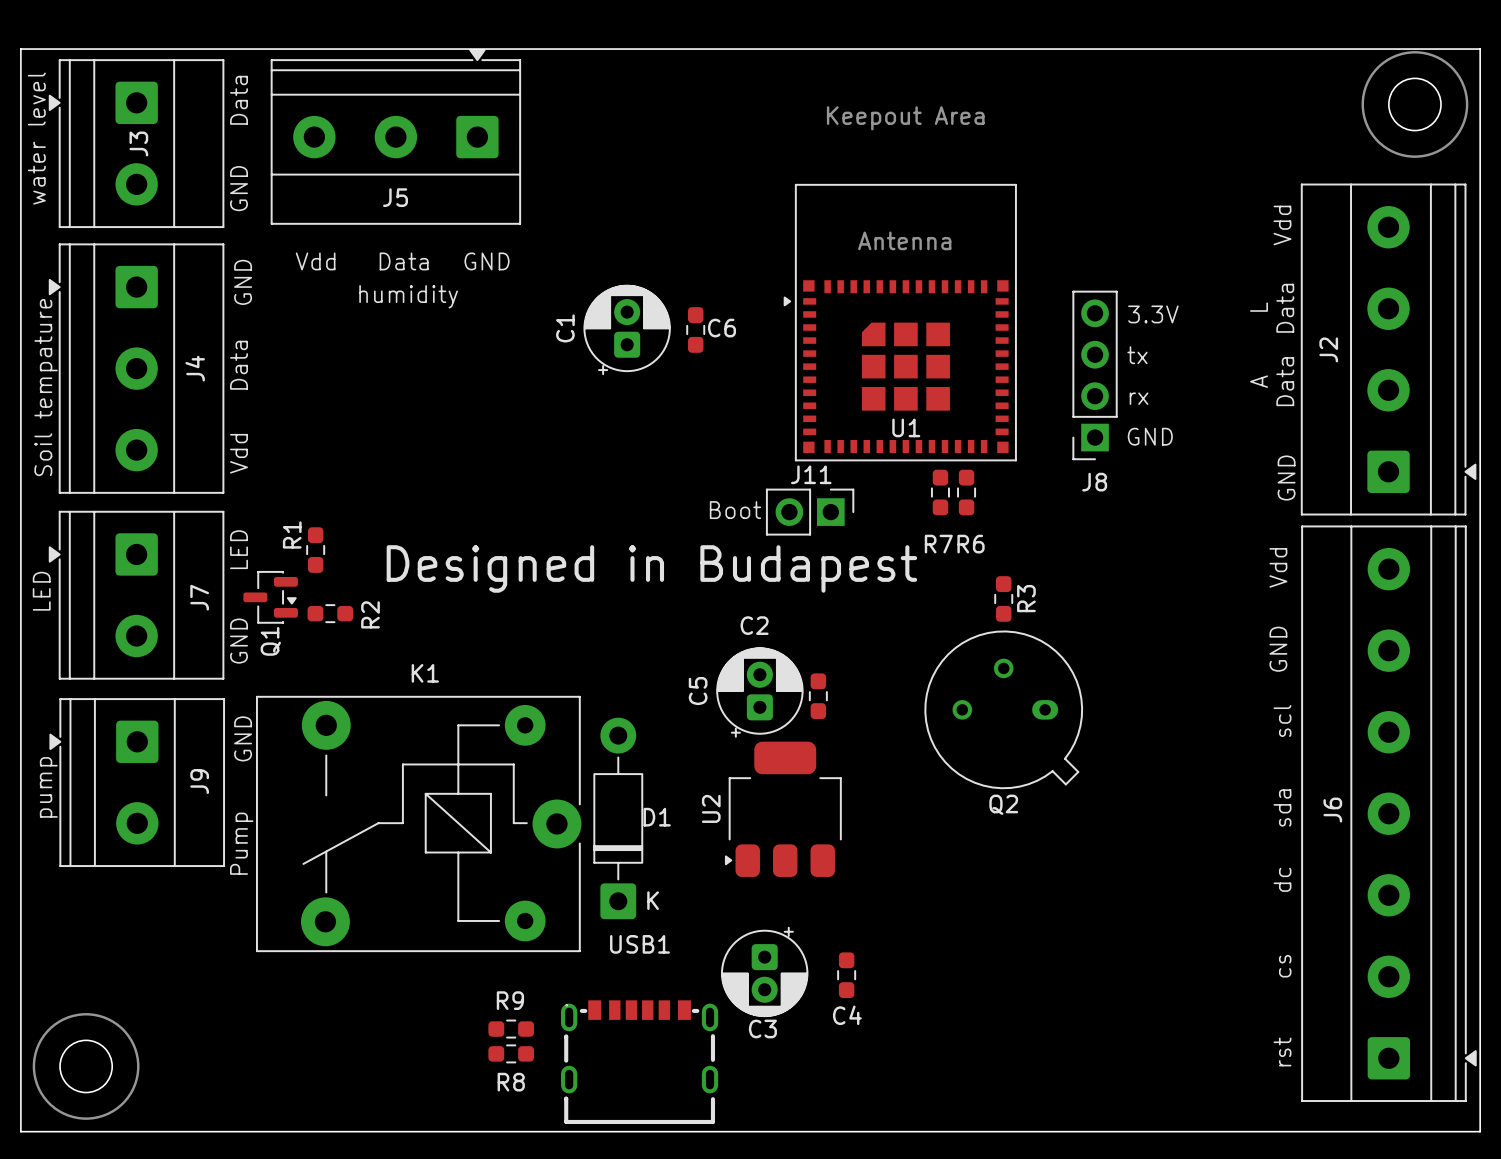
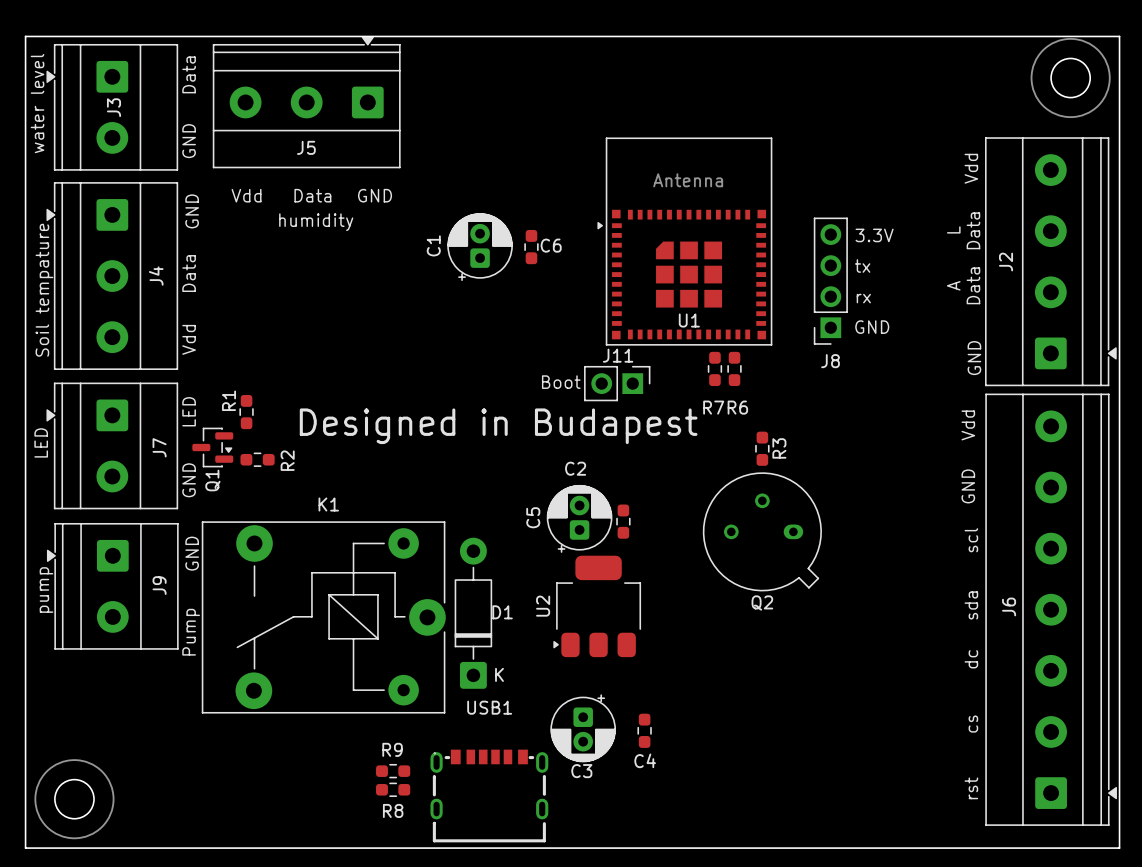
U1 text: Keepout Area (905, 118) -> none

